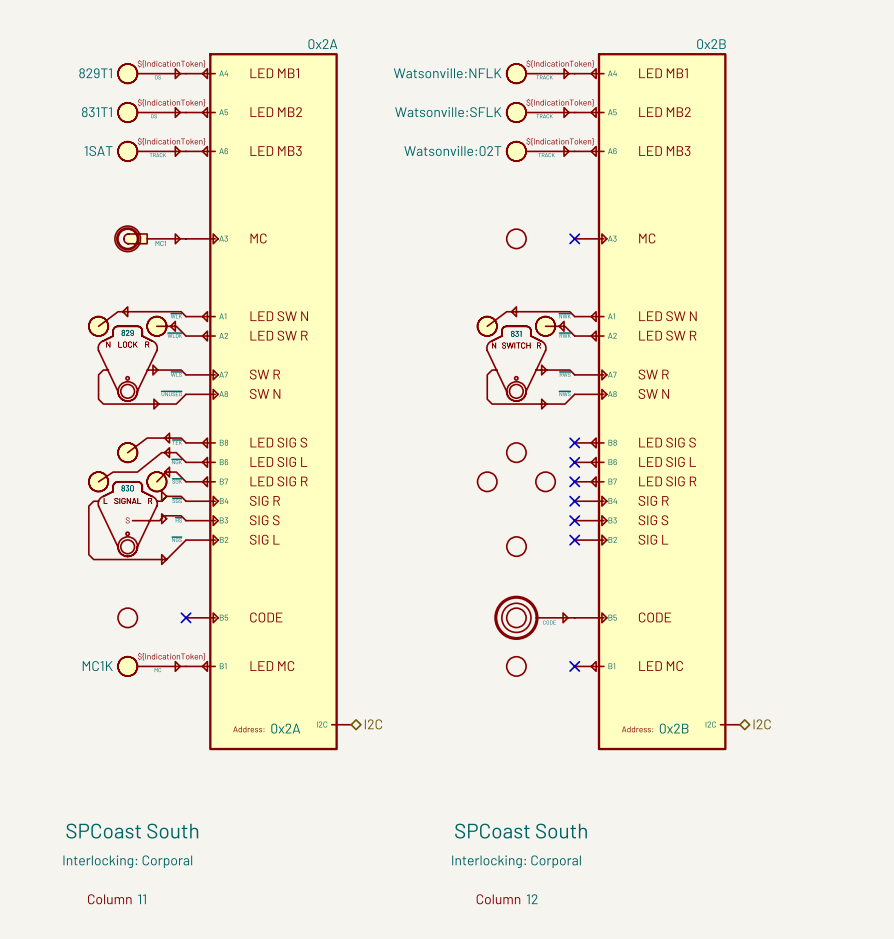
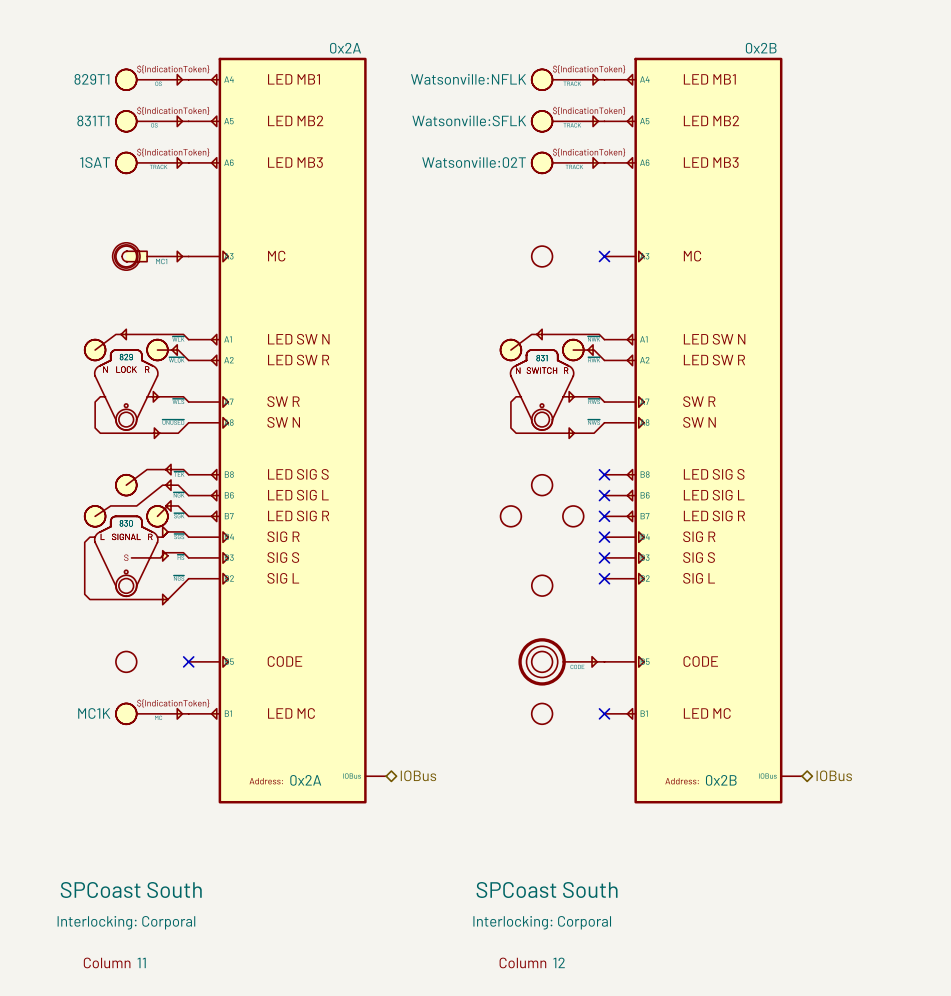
part: 0x2A (268, 401) -> none
part: none -> 0x2A (287, 430)
part: 0x2B (657, 401) -> none
part: none -> 0x2B (703, 430)
hierarchical label: I2C (373, 724) -> none
hierarchical label: none -> IOBus (418, 775)
hierarchical label: I2C (762, 724) -> none
hierarchical label: none -> IOBus (834, 775)

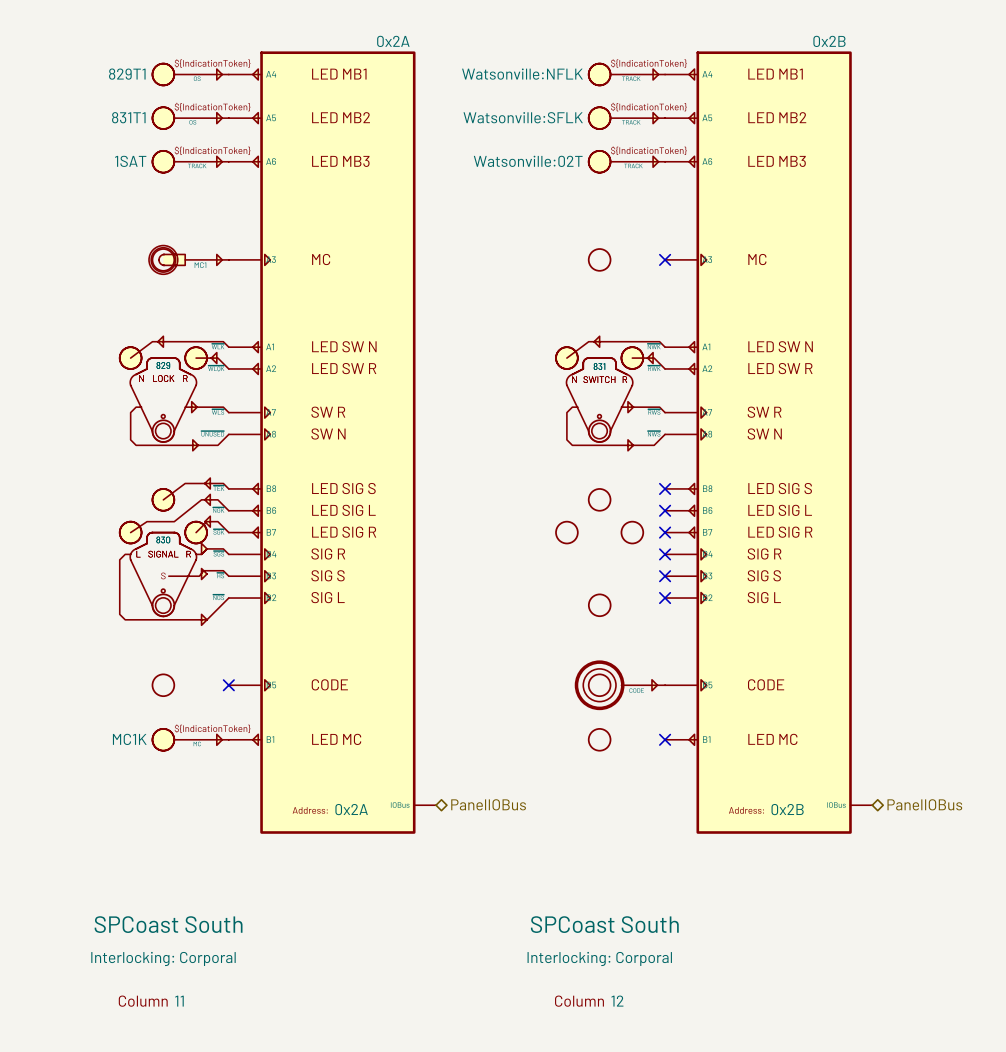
hierarchical label: IOBus (418, 775) -> PanelIOBus (488, 804)
hierarchical label: IOBus (834, 775) -> PanelIOBus (924, 804)

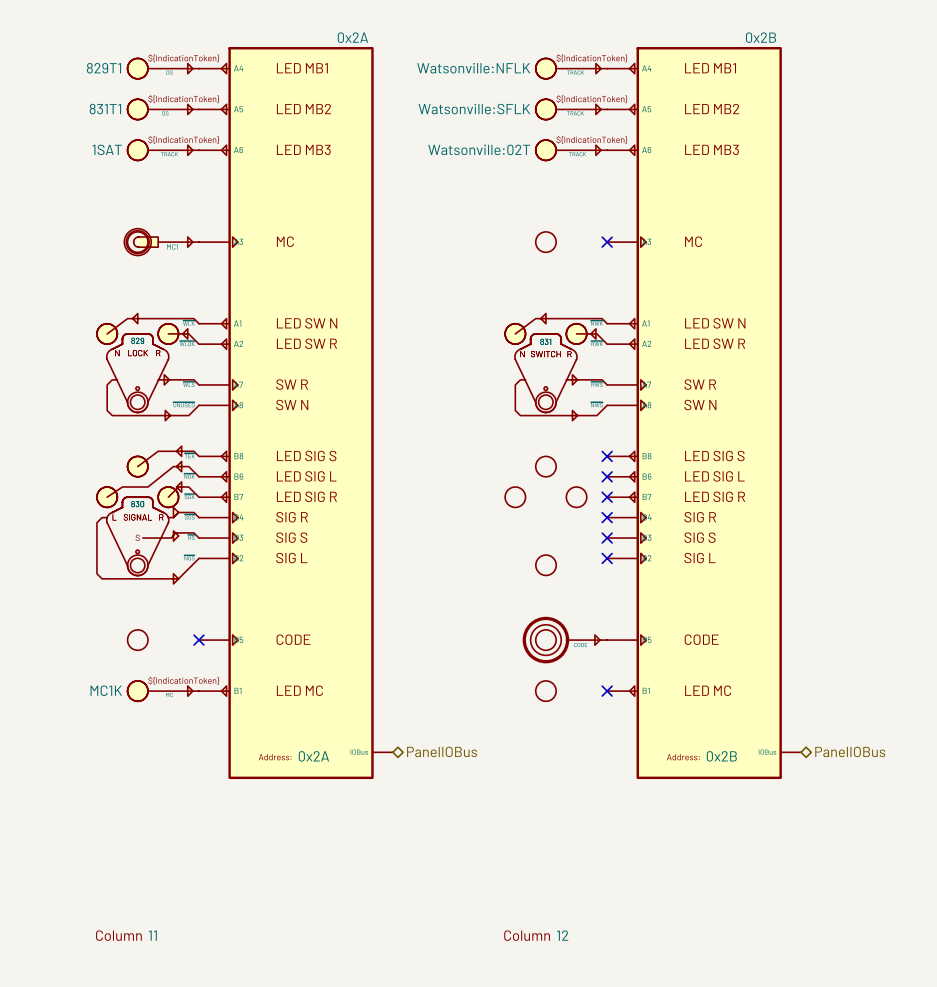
part text: SPCoast South (168, 924) -> none
part text: SPCoast South (604, 924) -> none
part text: Interlocking: Corporal (163, 958) -> none
part text: Interlocking: Corporal (599, 958) -> none

